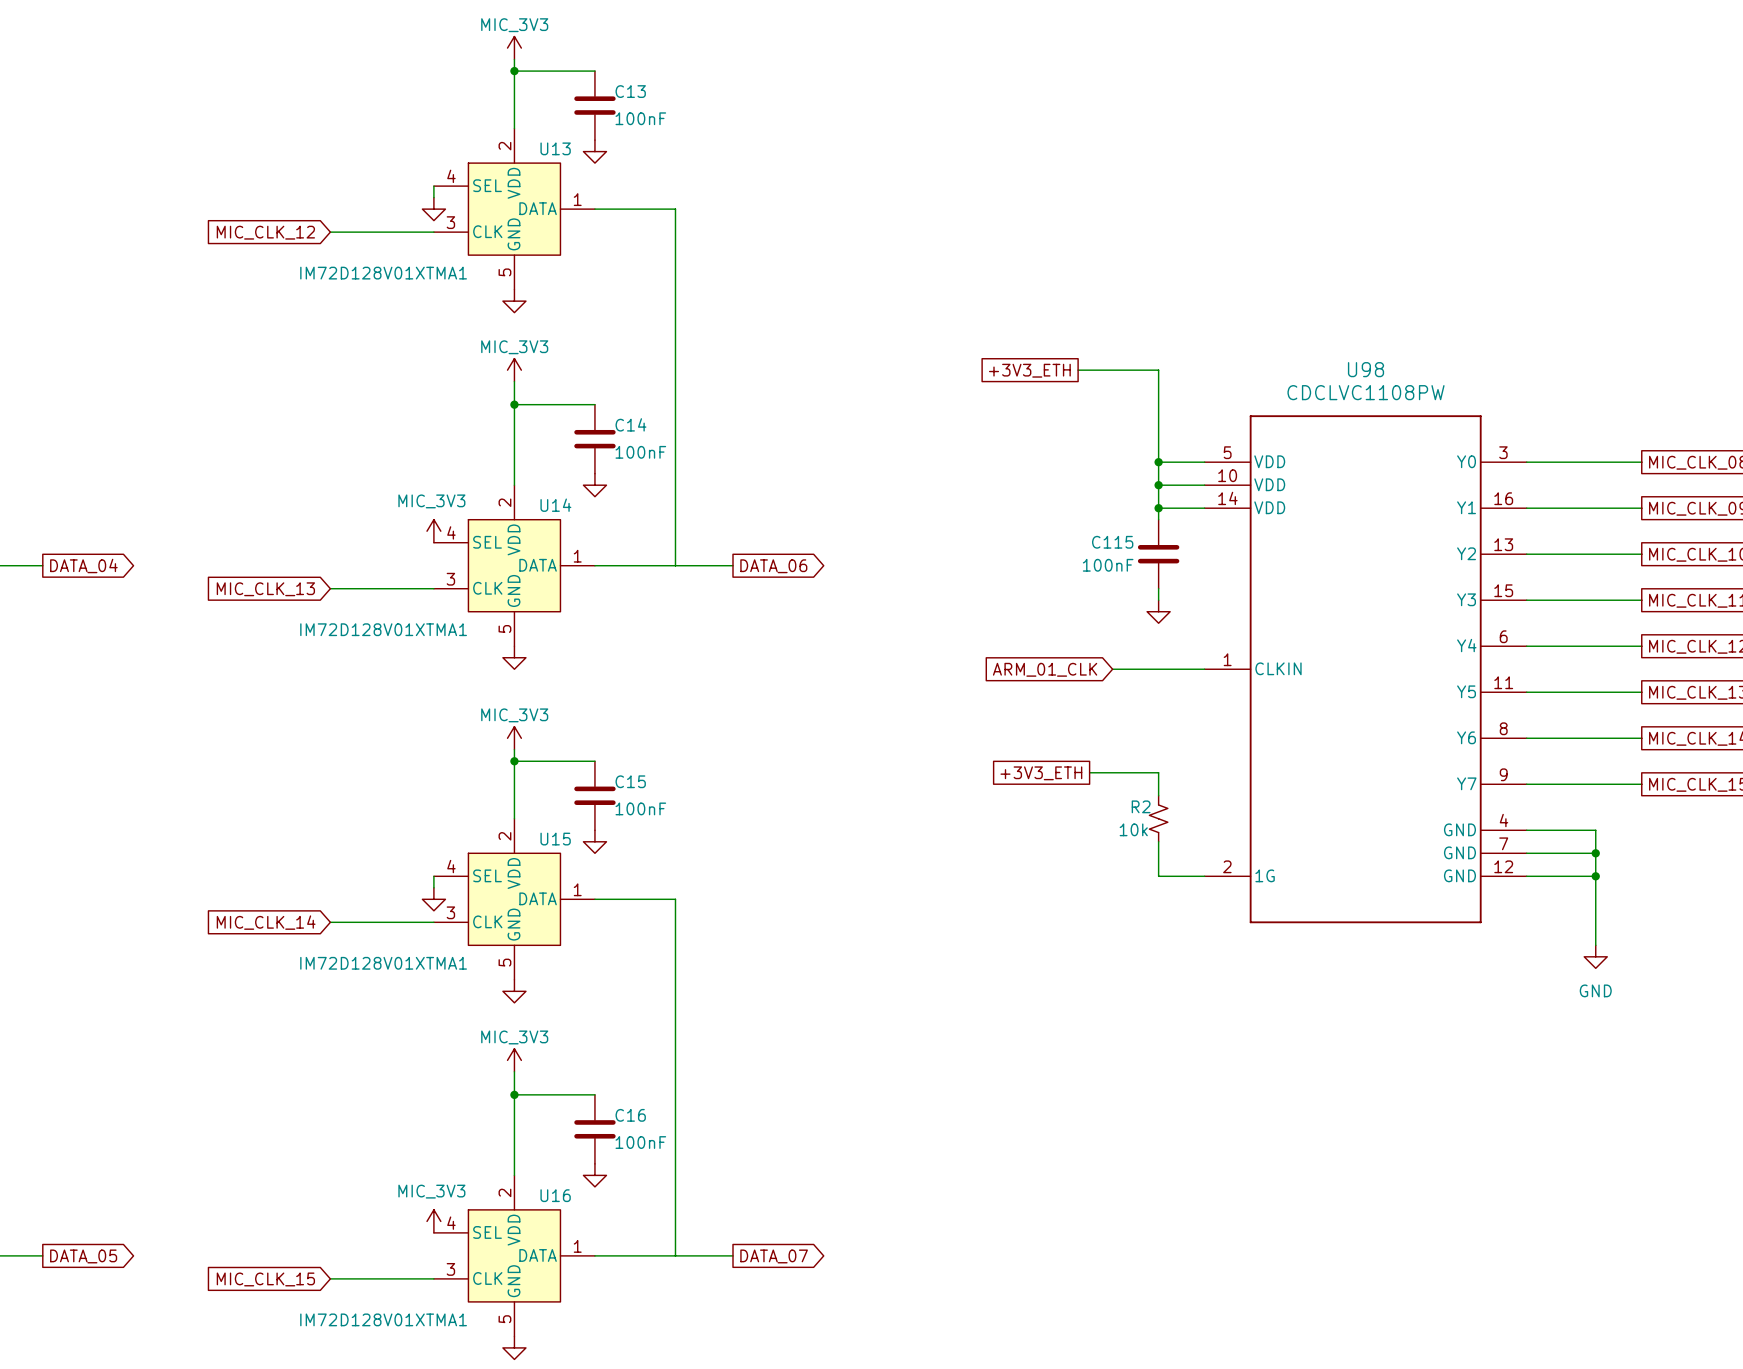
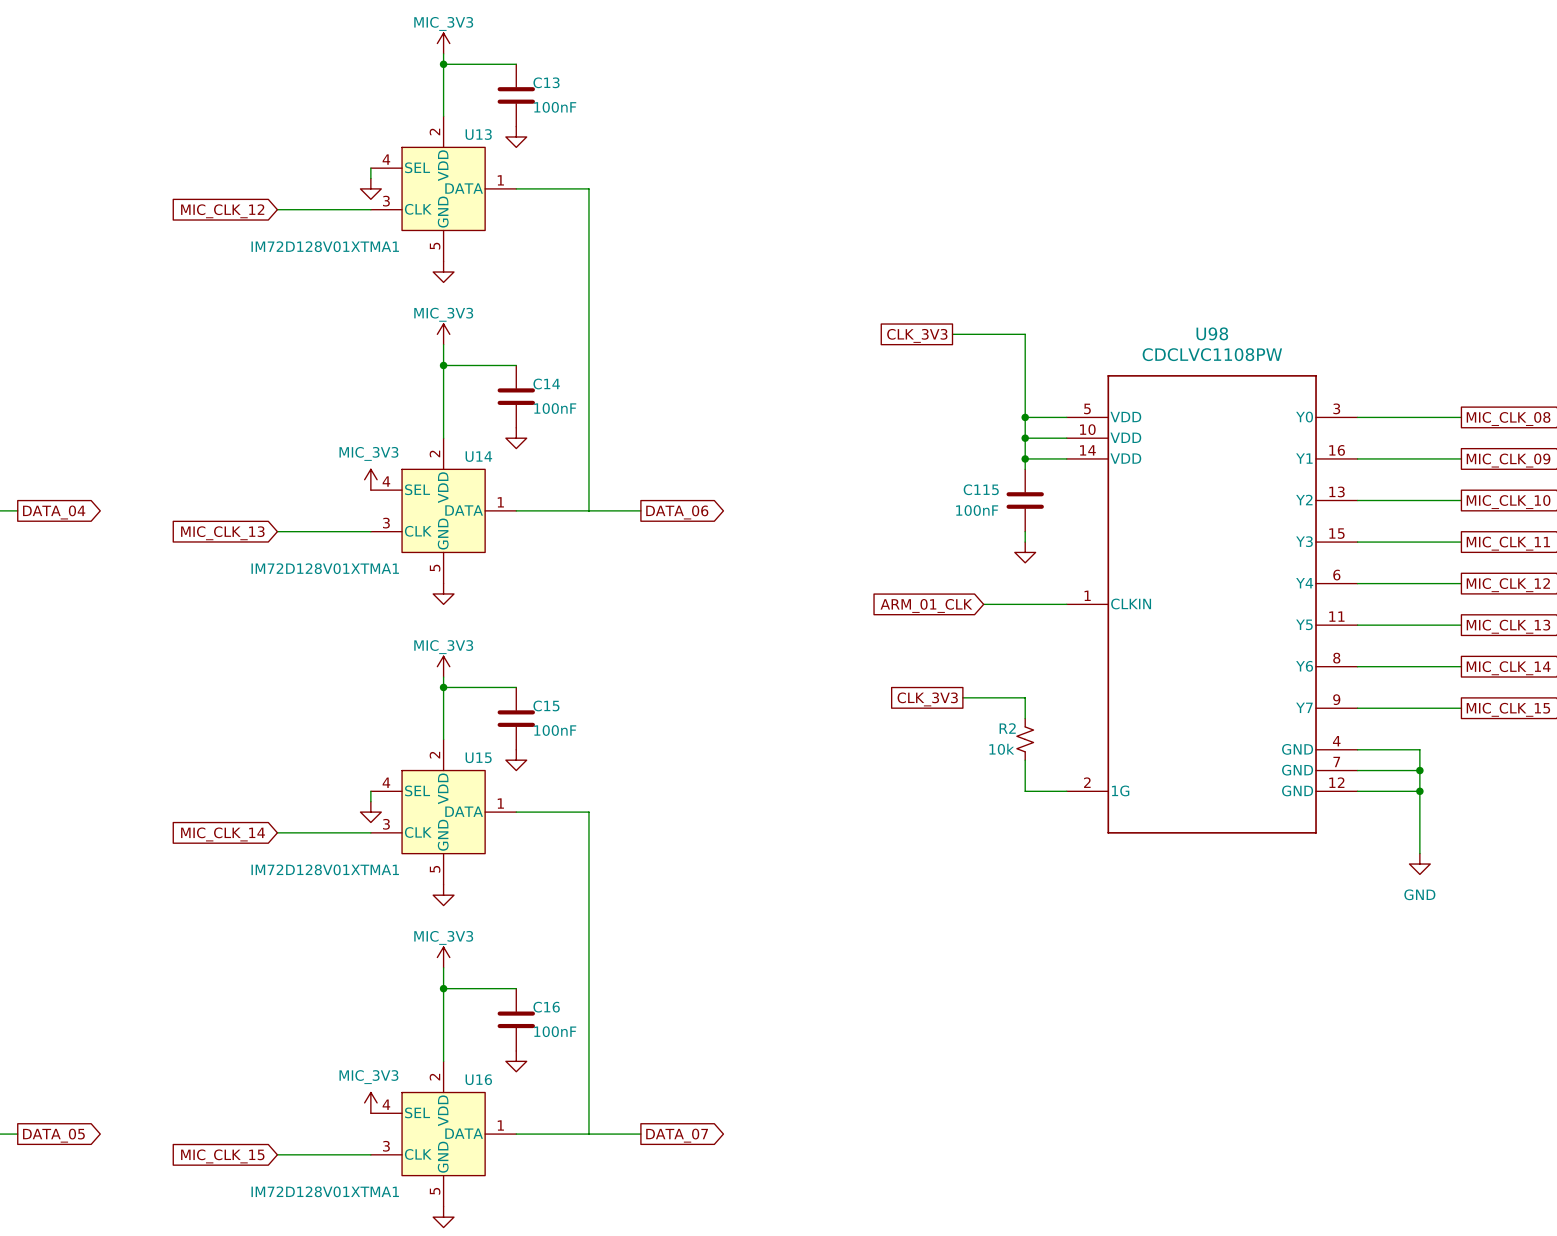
global label: +3V3_ETH (1029, 370) -> CLK_3V3 (917, 335)
global label: +3V3_ETH (1041, 773) -> CLK_3V3 (927, 699)

